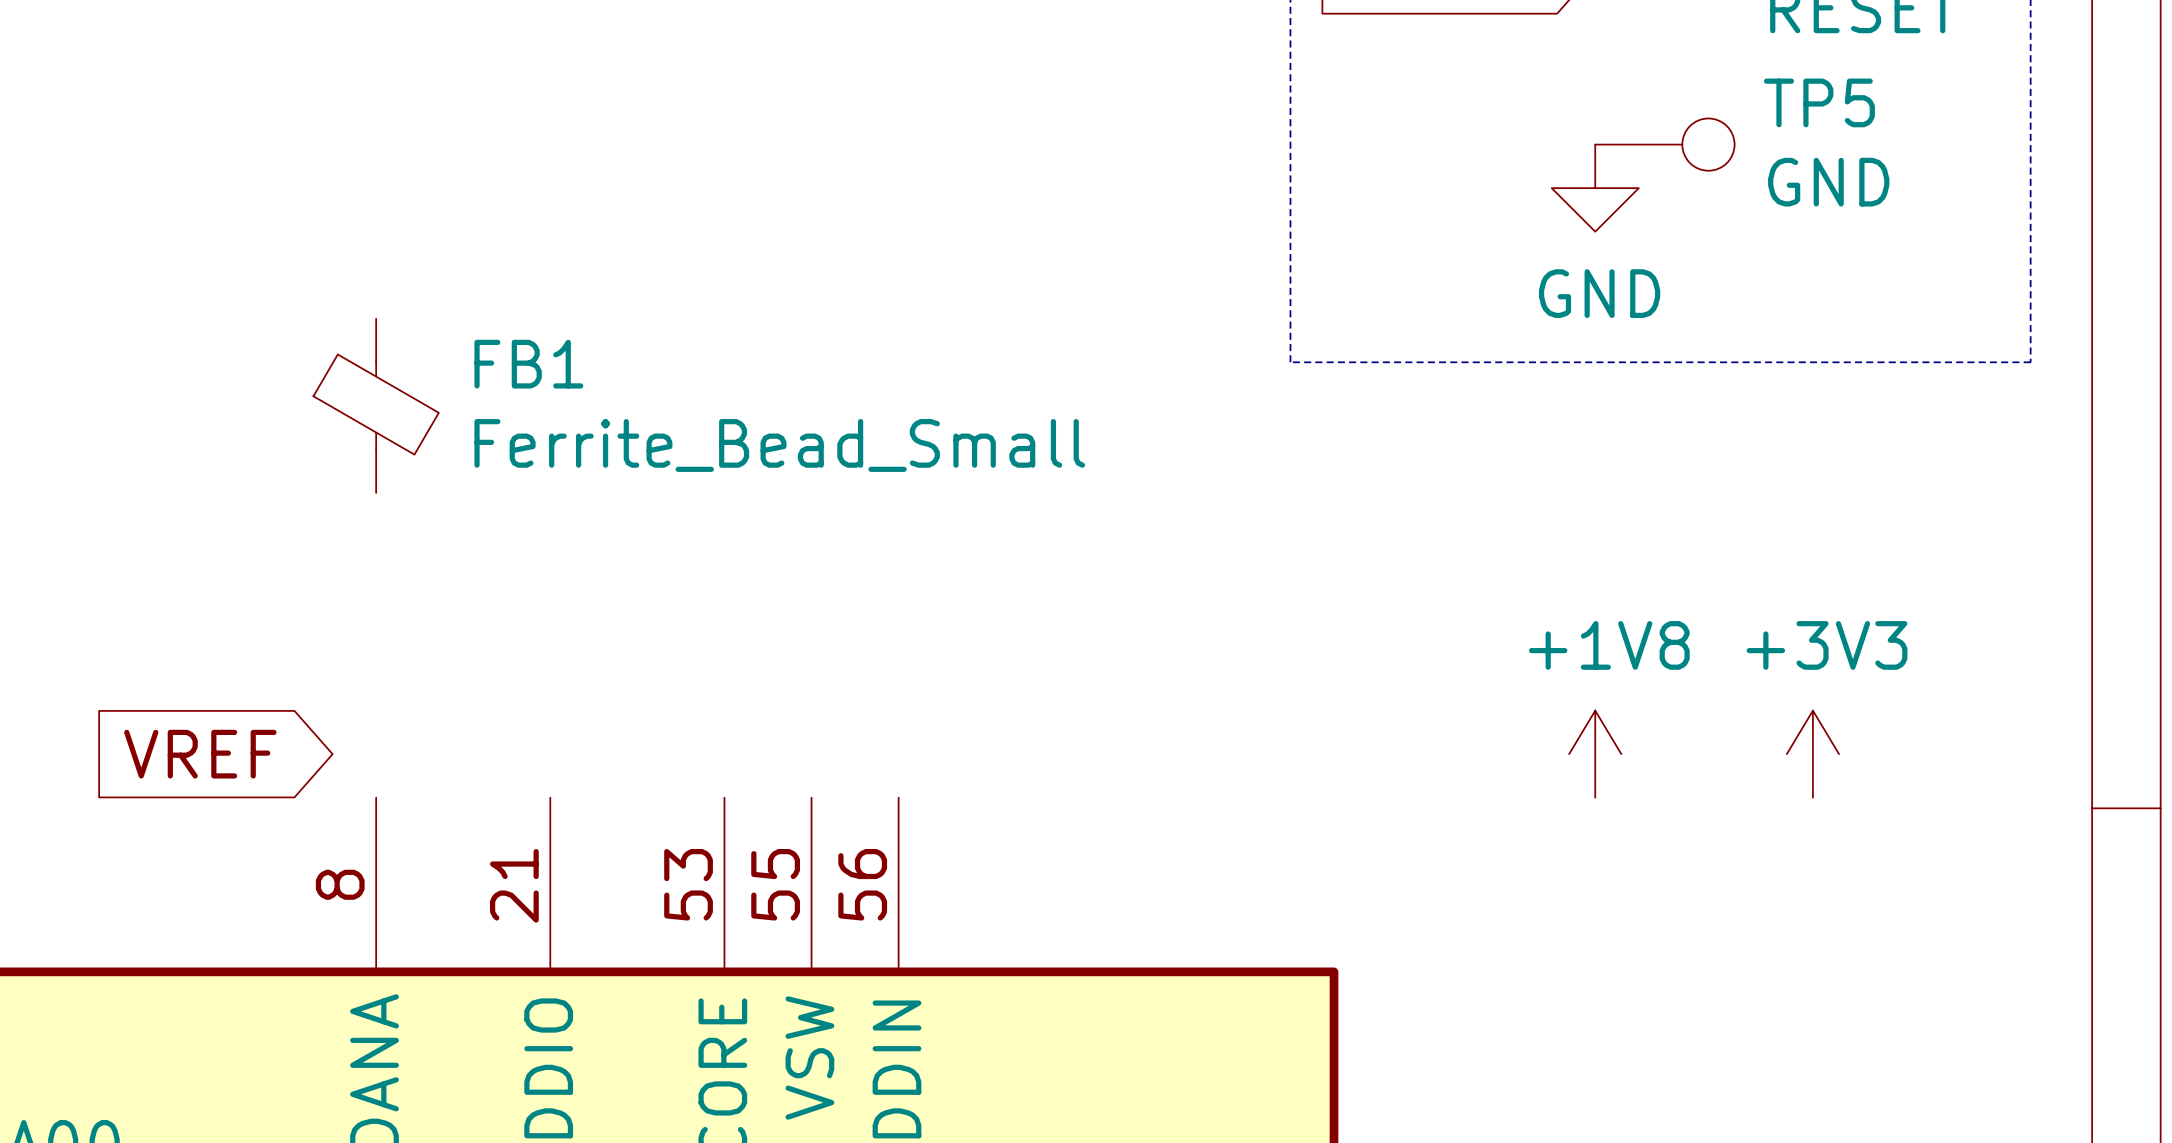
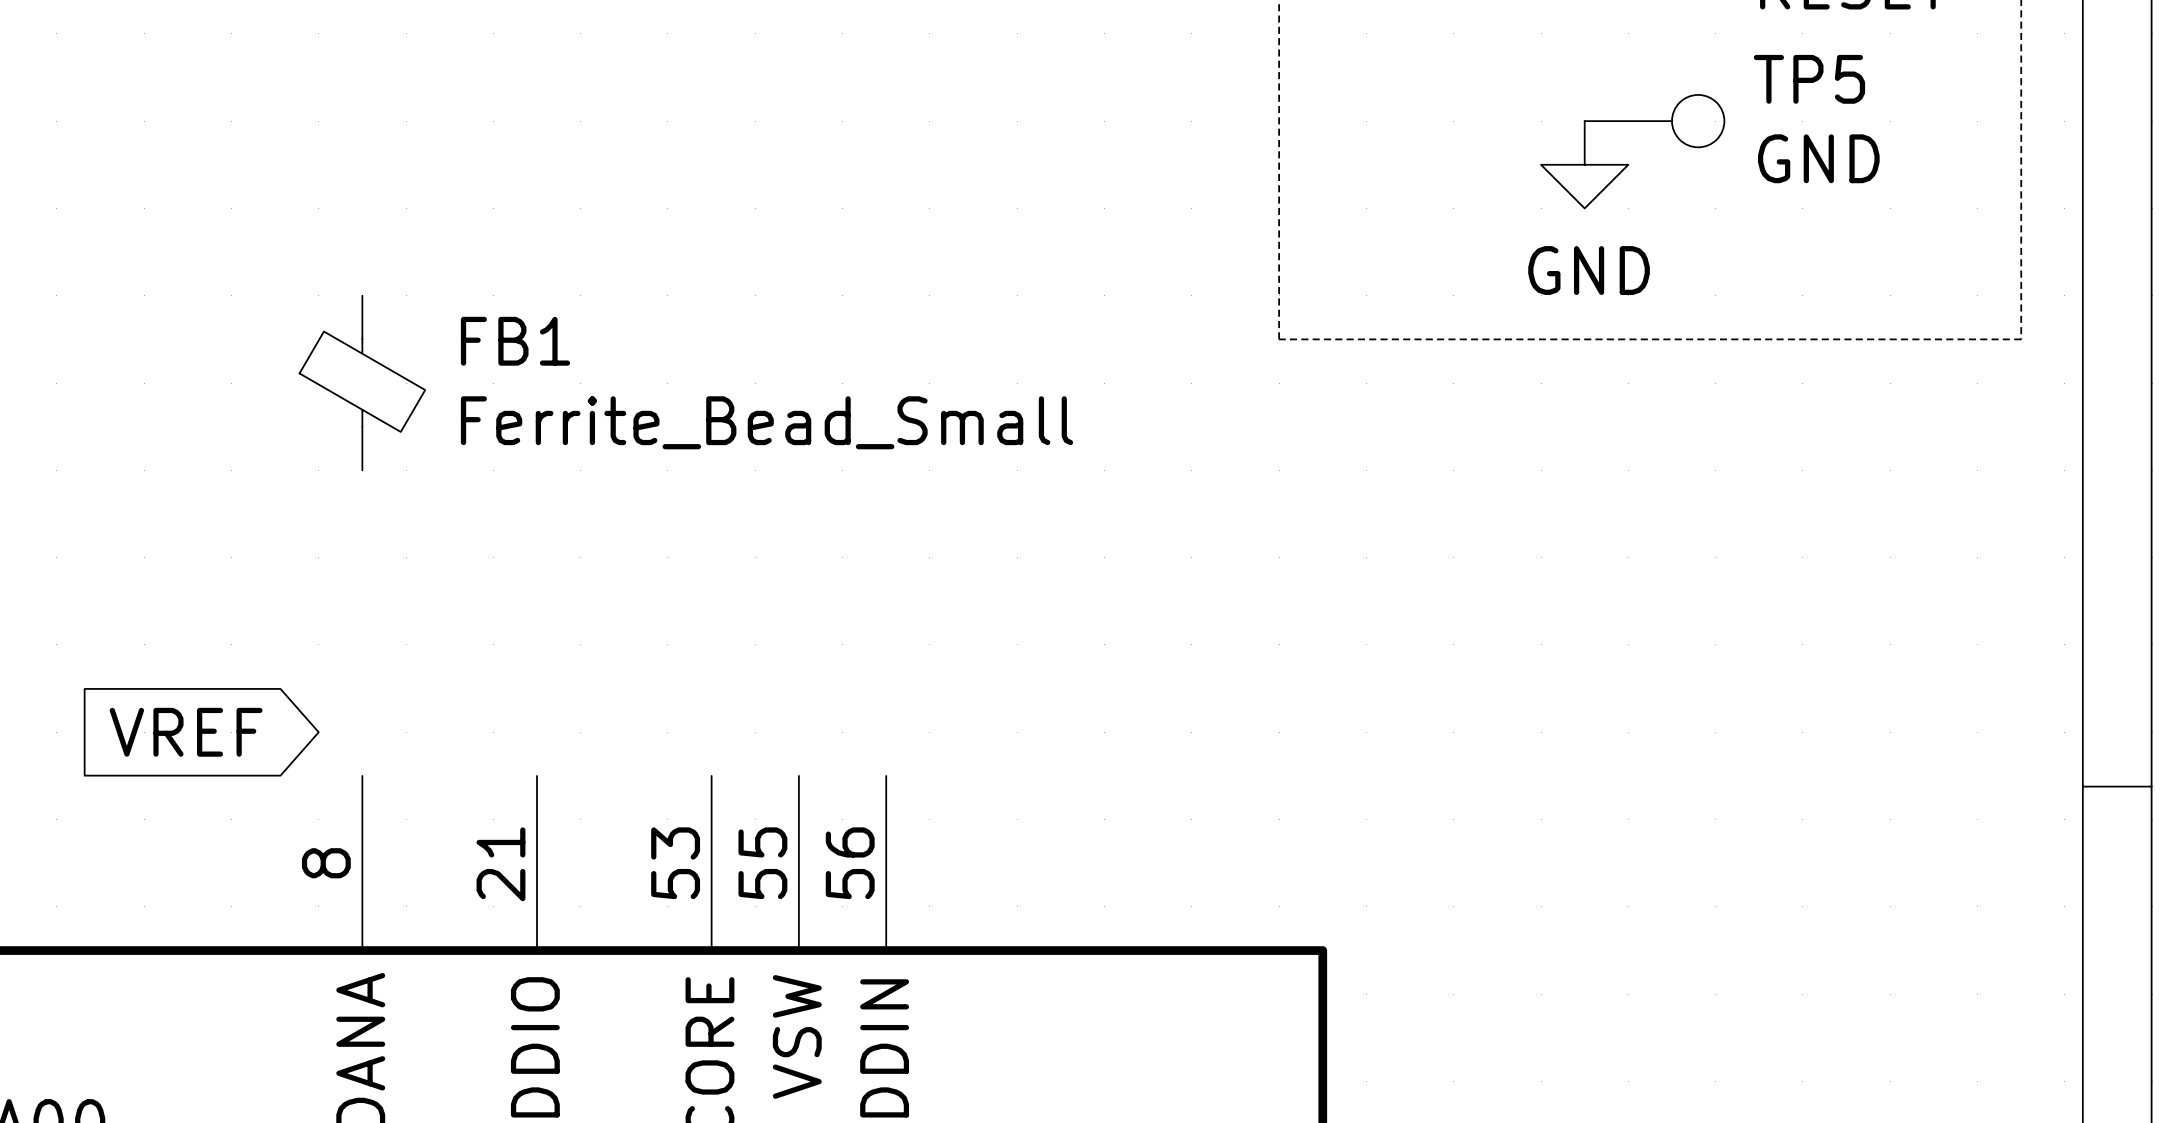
power symbol: +1V8 (1595, 754) -> none
power symbol: +3V3 (1812, 754) -> none

